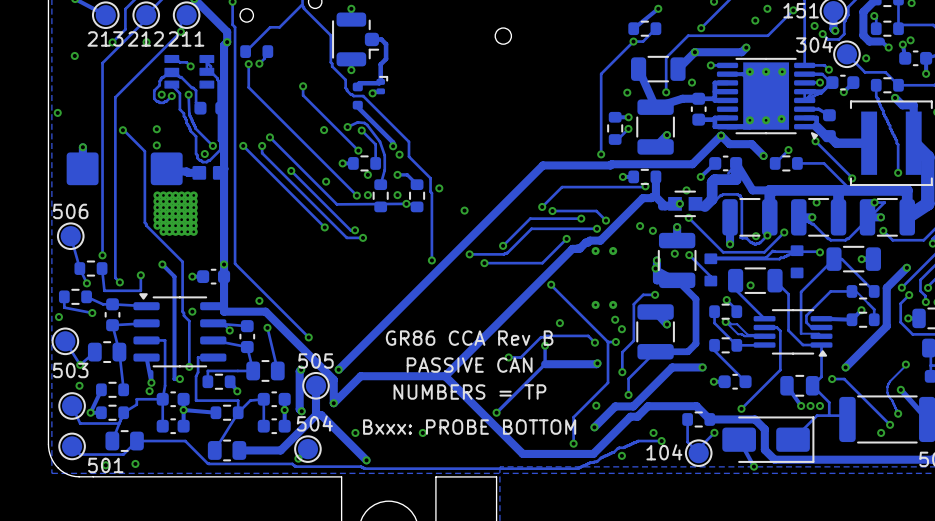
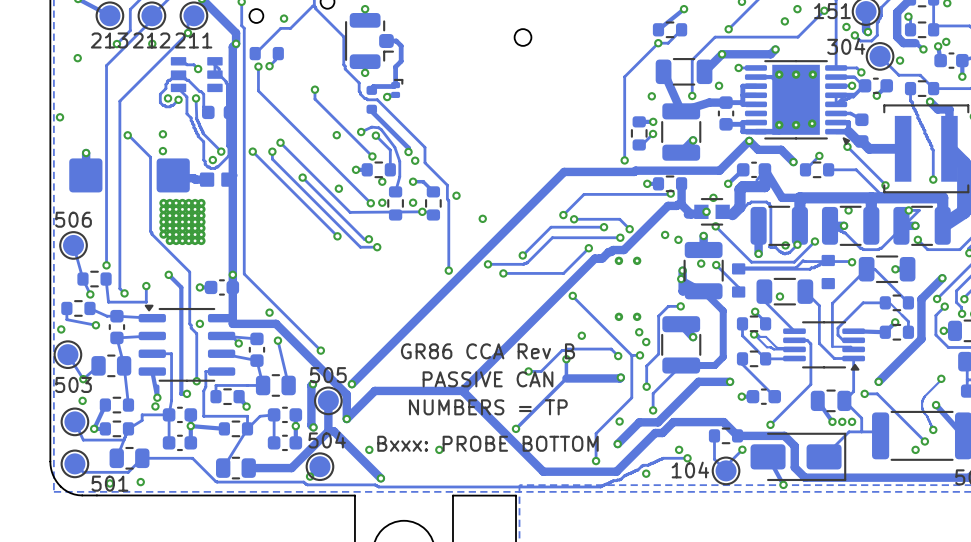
via: none -> (284, 18)

